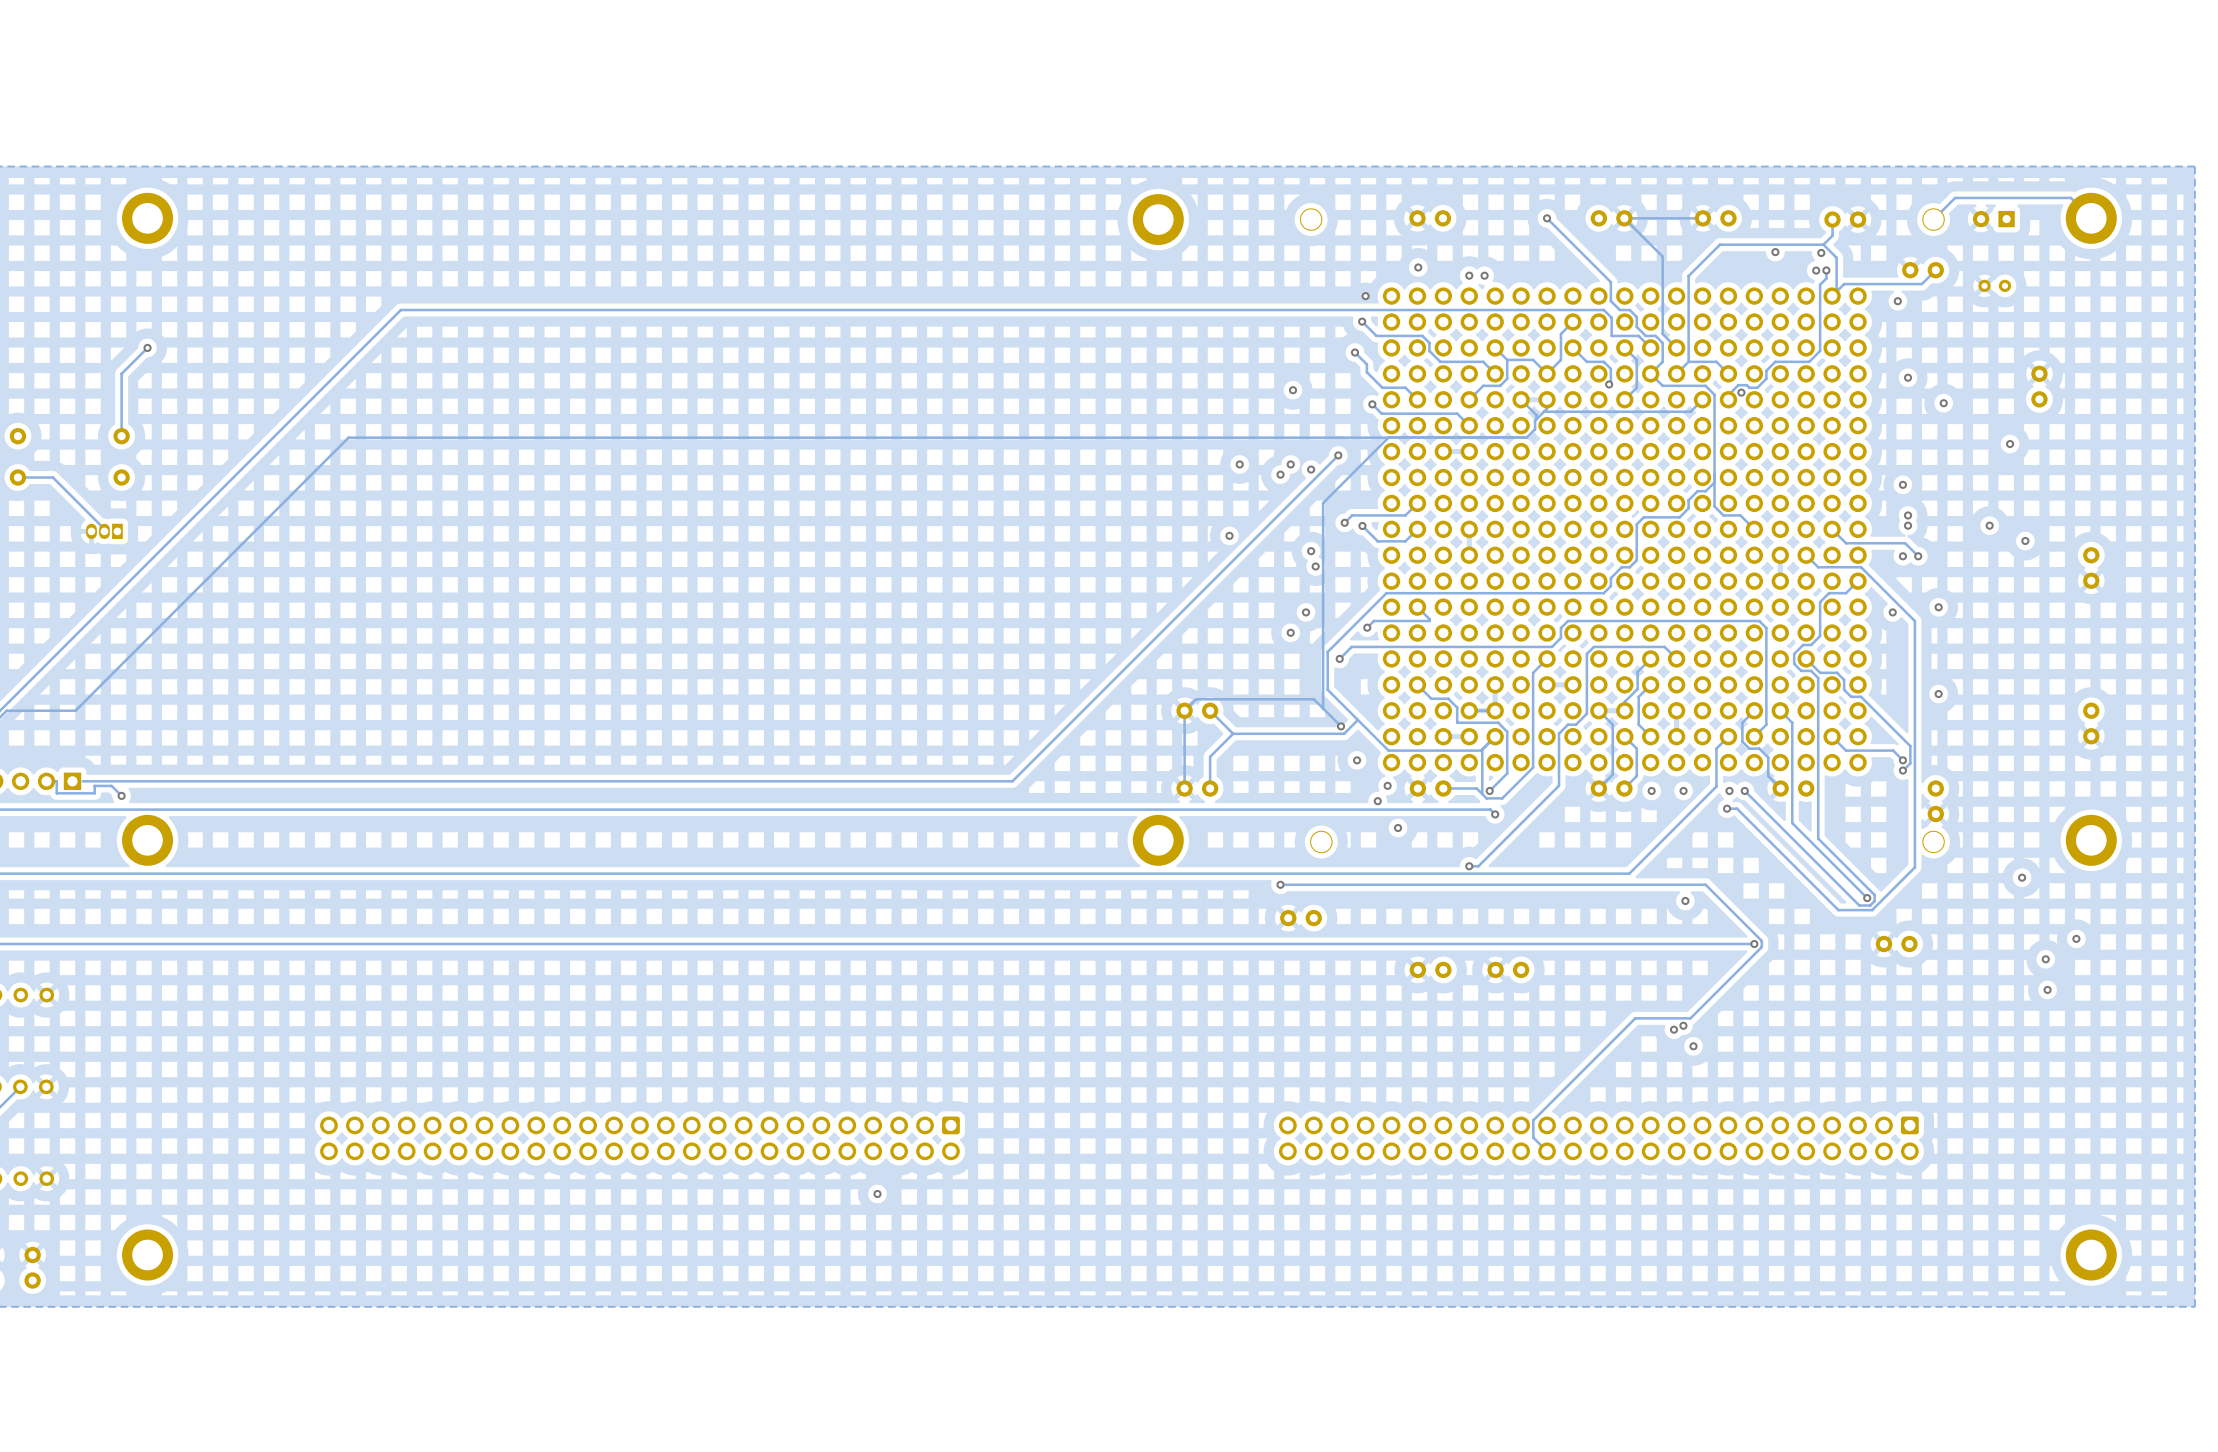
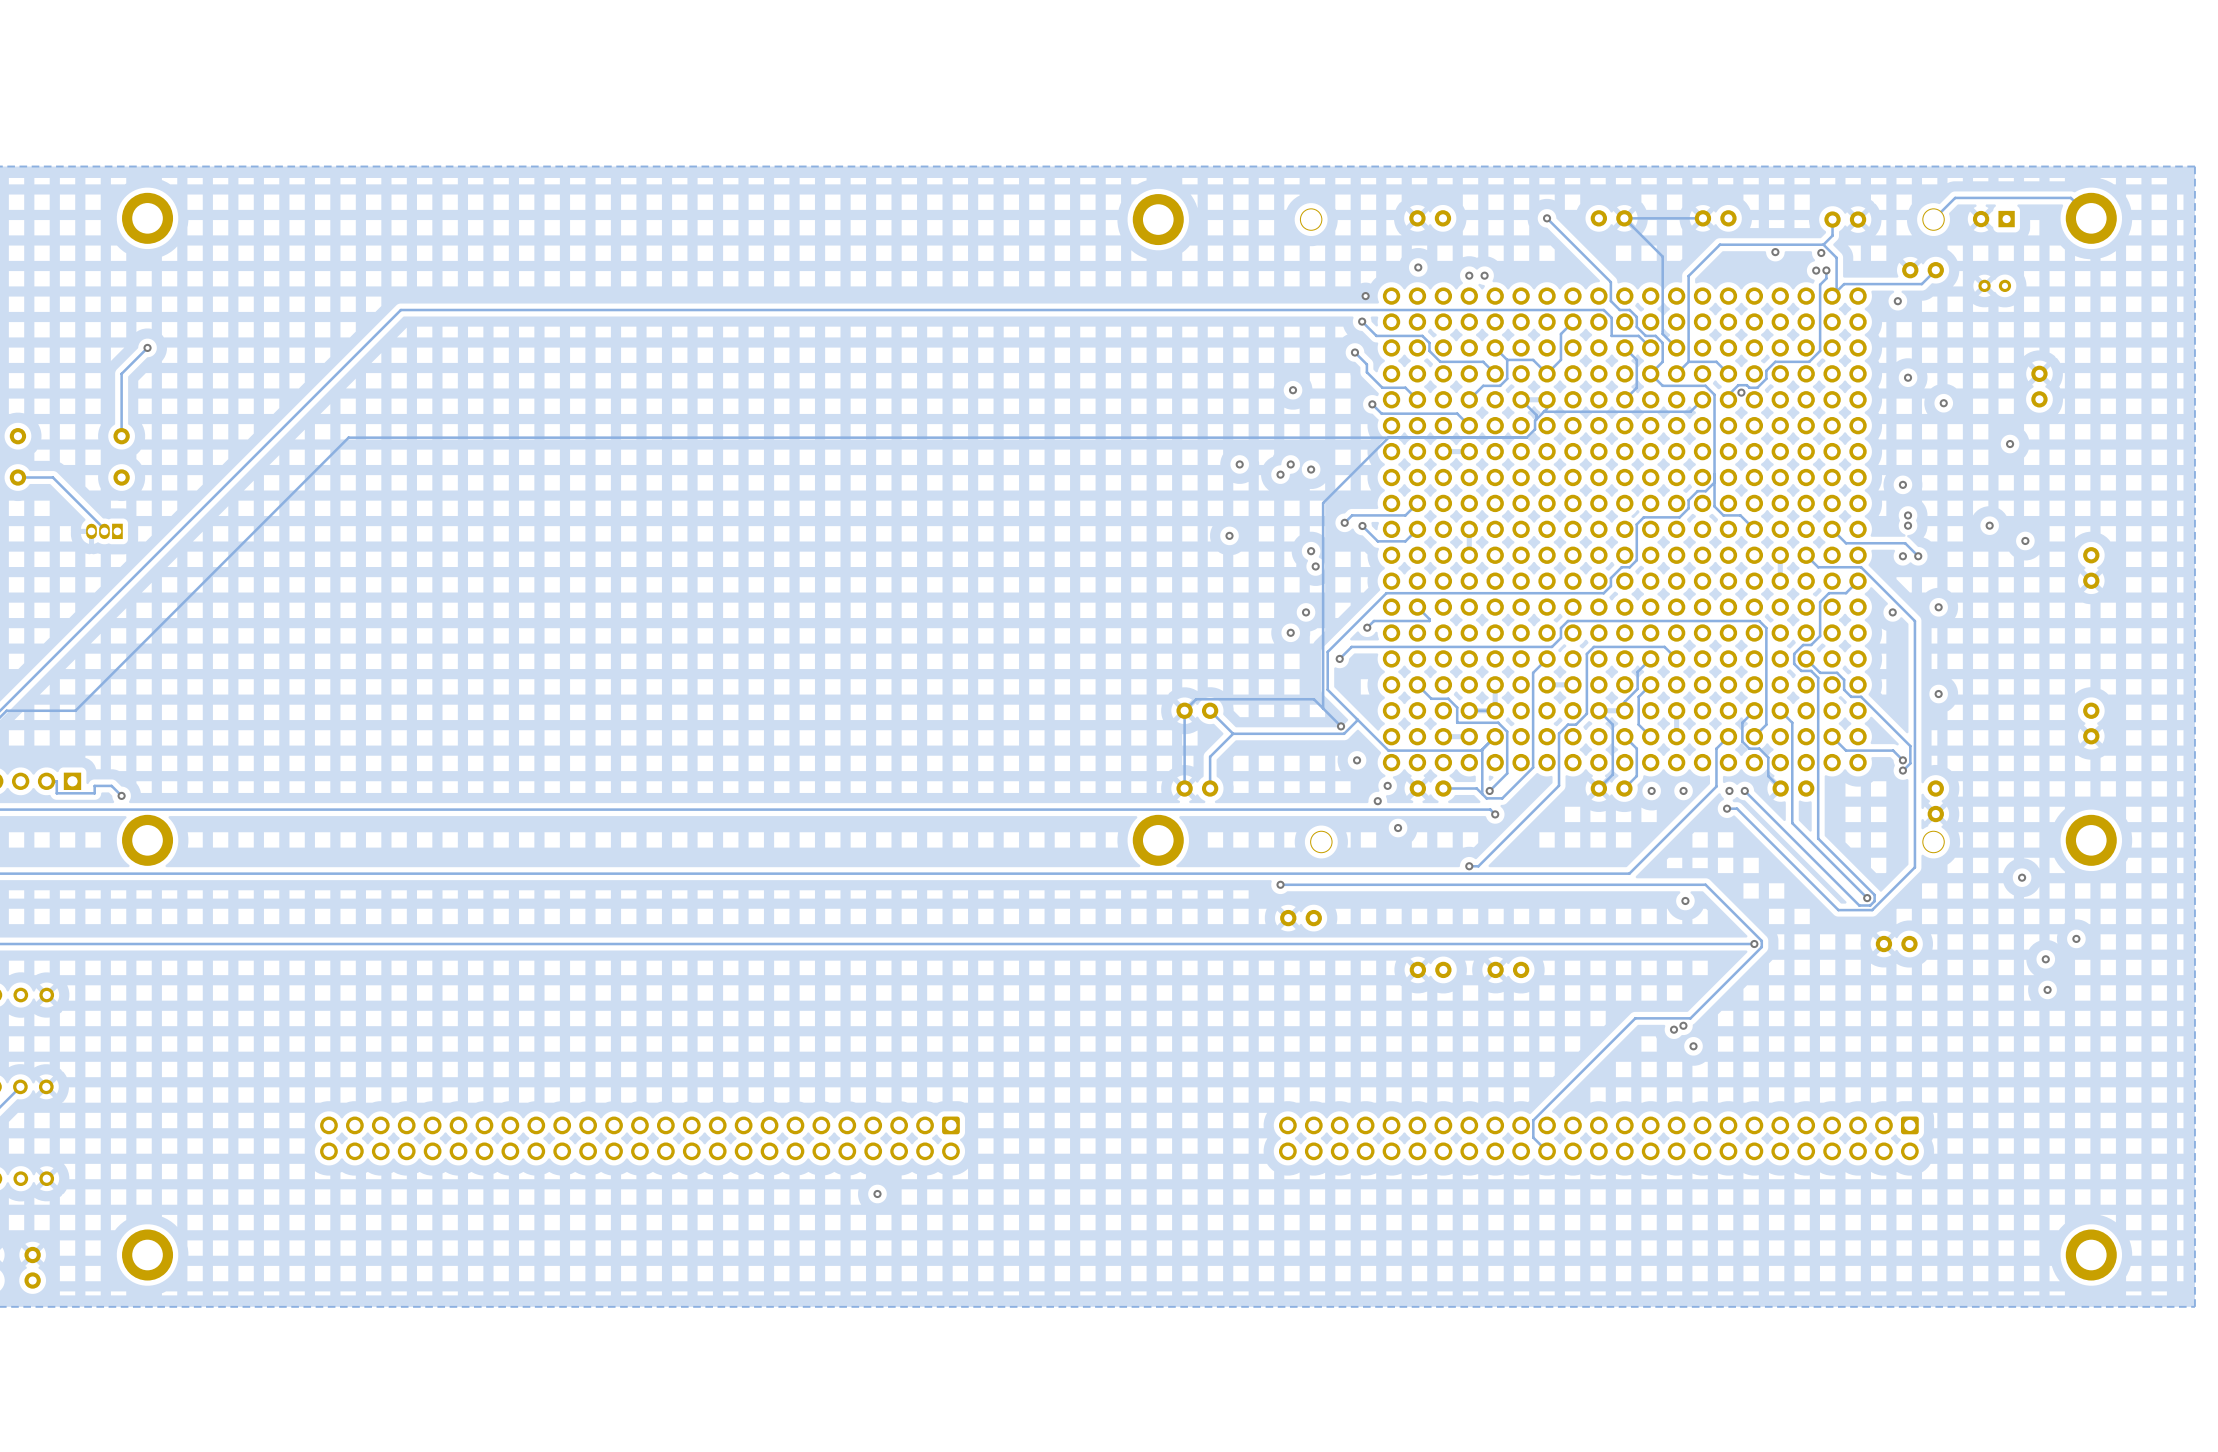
track: (1572, 347) (1586, 361) (1603, 361) (1610, 368) (1609, 384) -> none
via: (1609, 384) -> none
track: (1338, 455) (1012, 781) (82, 781) -> none
via: (1338, 455) -> none

